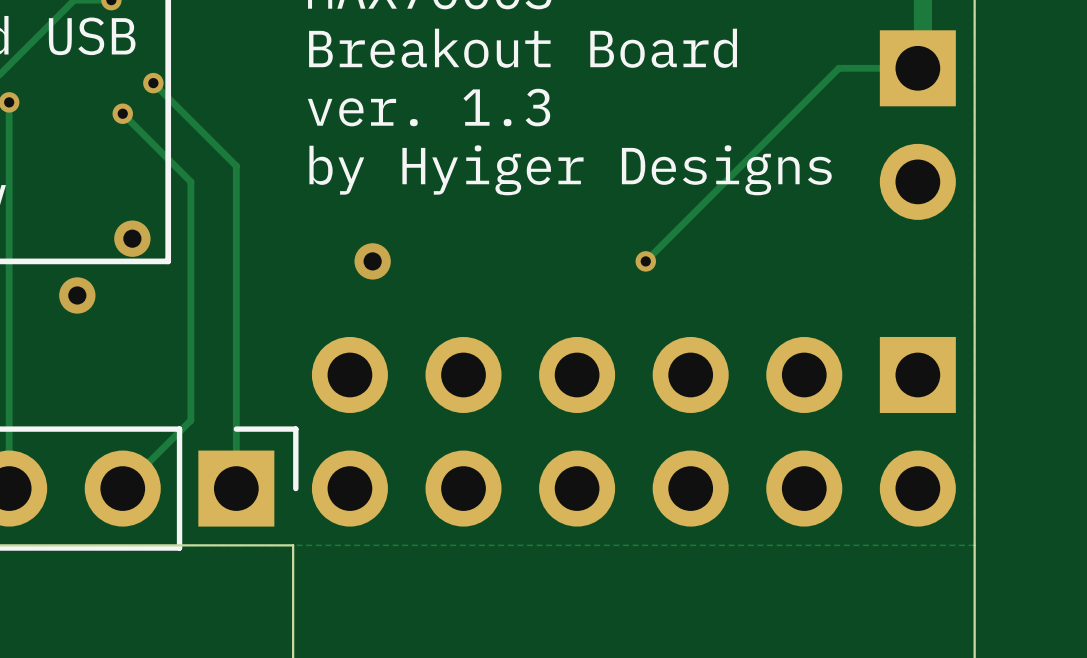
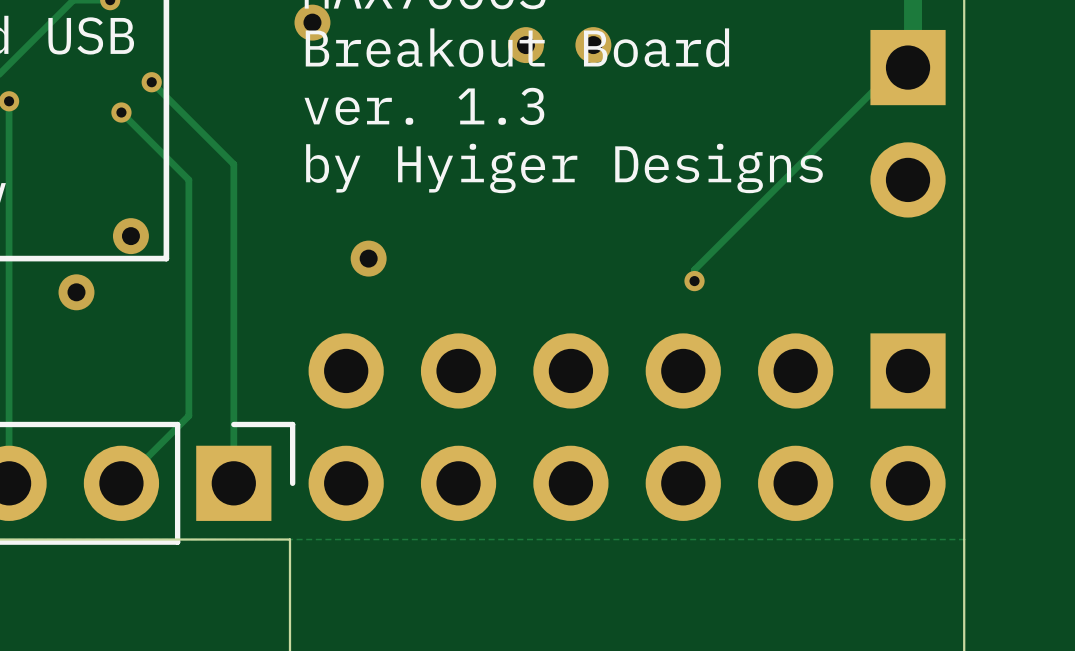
via: none -> (312, 22)
via: none -> (525, 45)
via: none -> (593, 45)
track: (906, 68) (838, 68) (645, 261) -> (896, 67) (694, 269) (694, 281)
via position: (645, 261) -> (694, 281)

